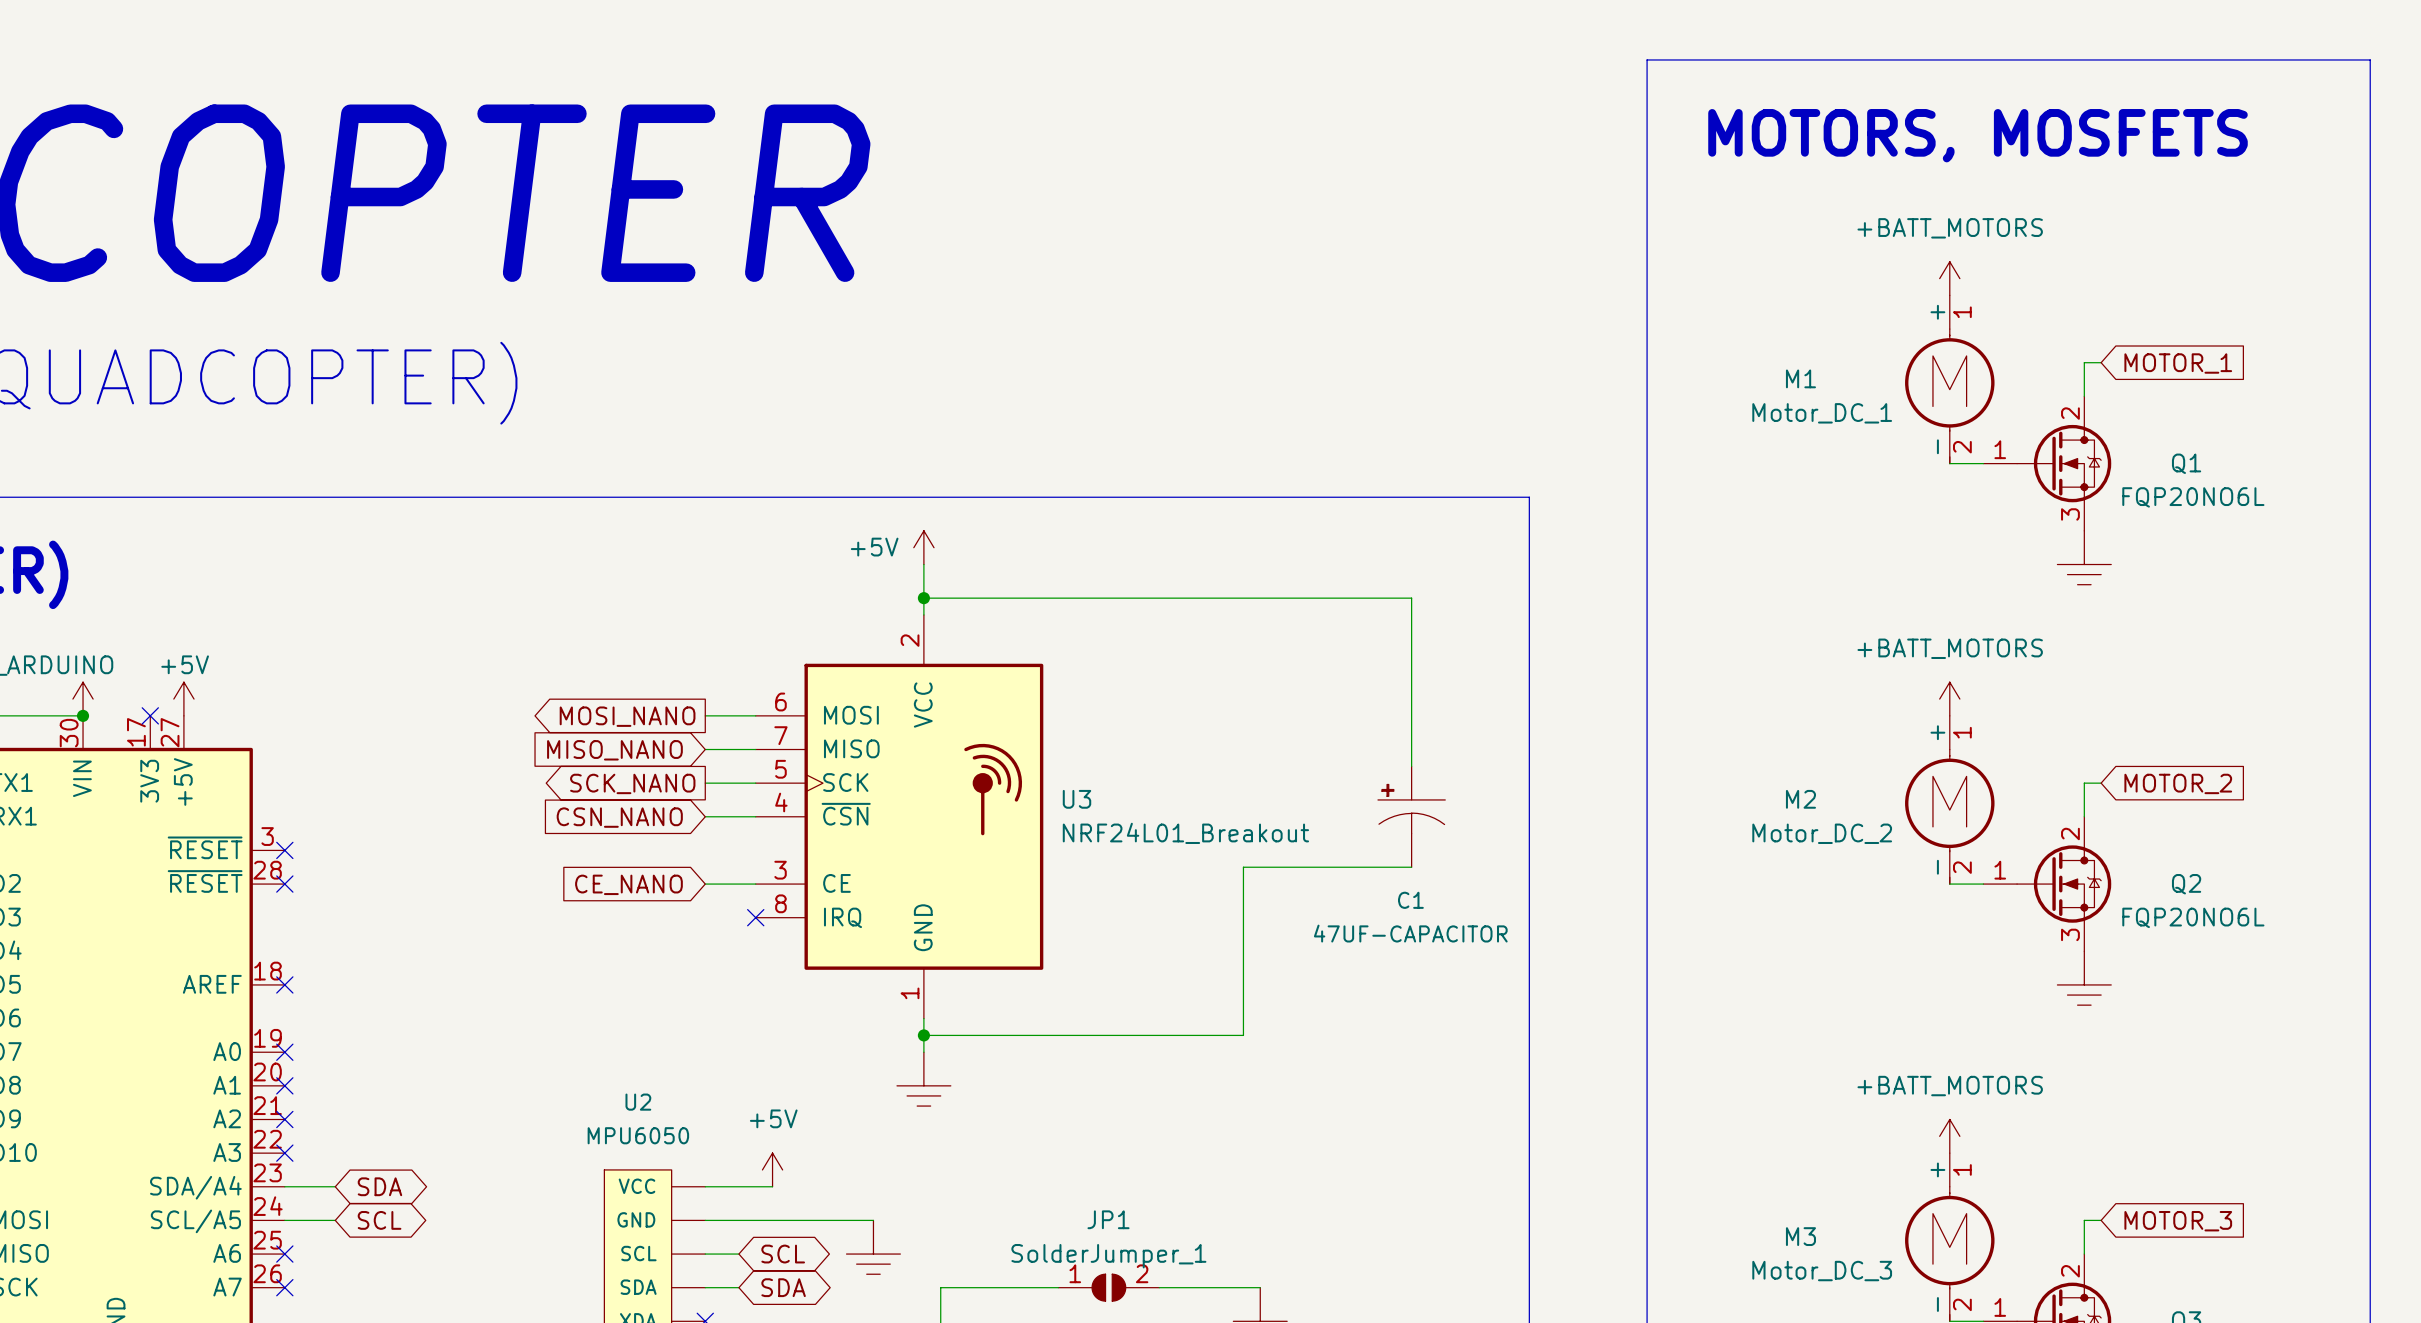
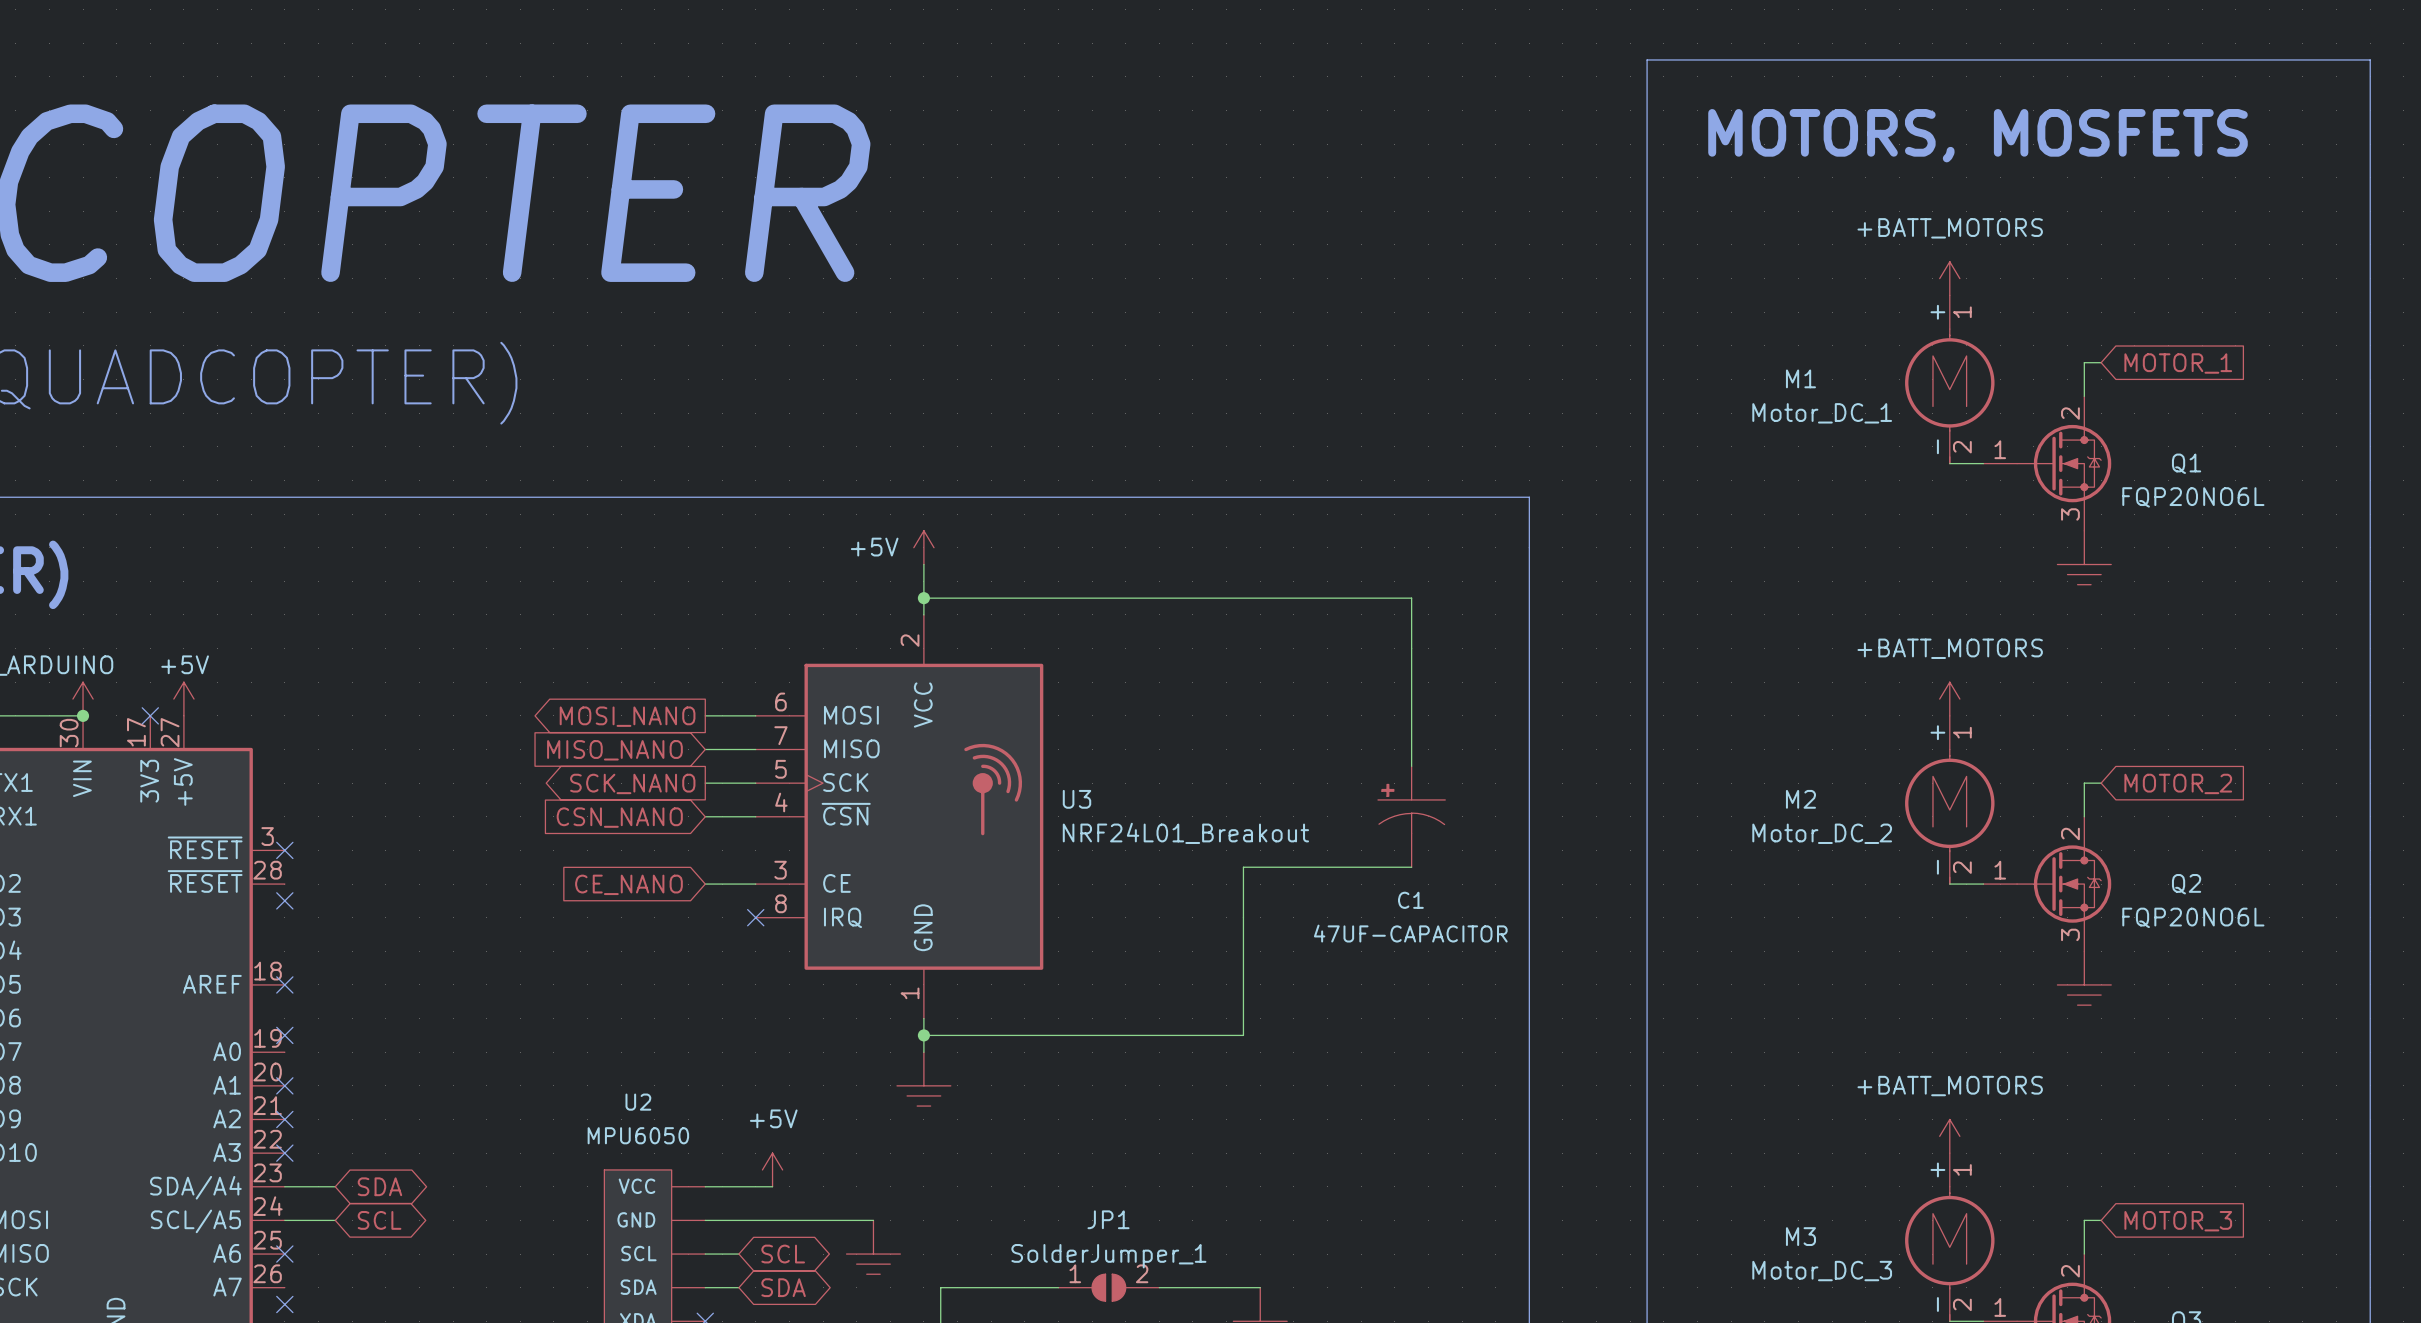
no-connect mark position: (284, 884) -> (284, 900)
no-connect mark position: (284, 1052) -> (284, 1035)
no-connect mark position: (284, 1287) -> (284, 1304)

